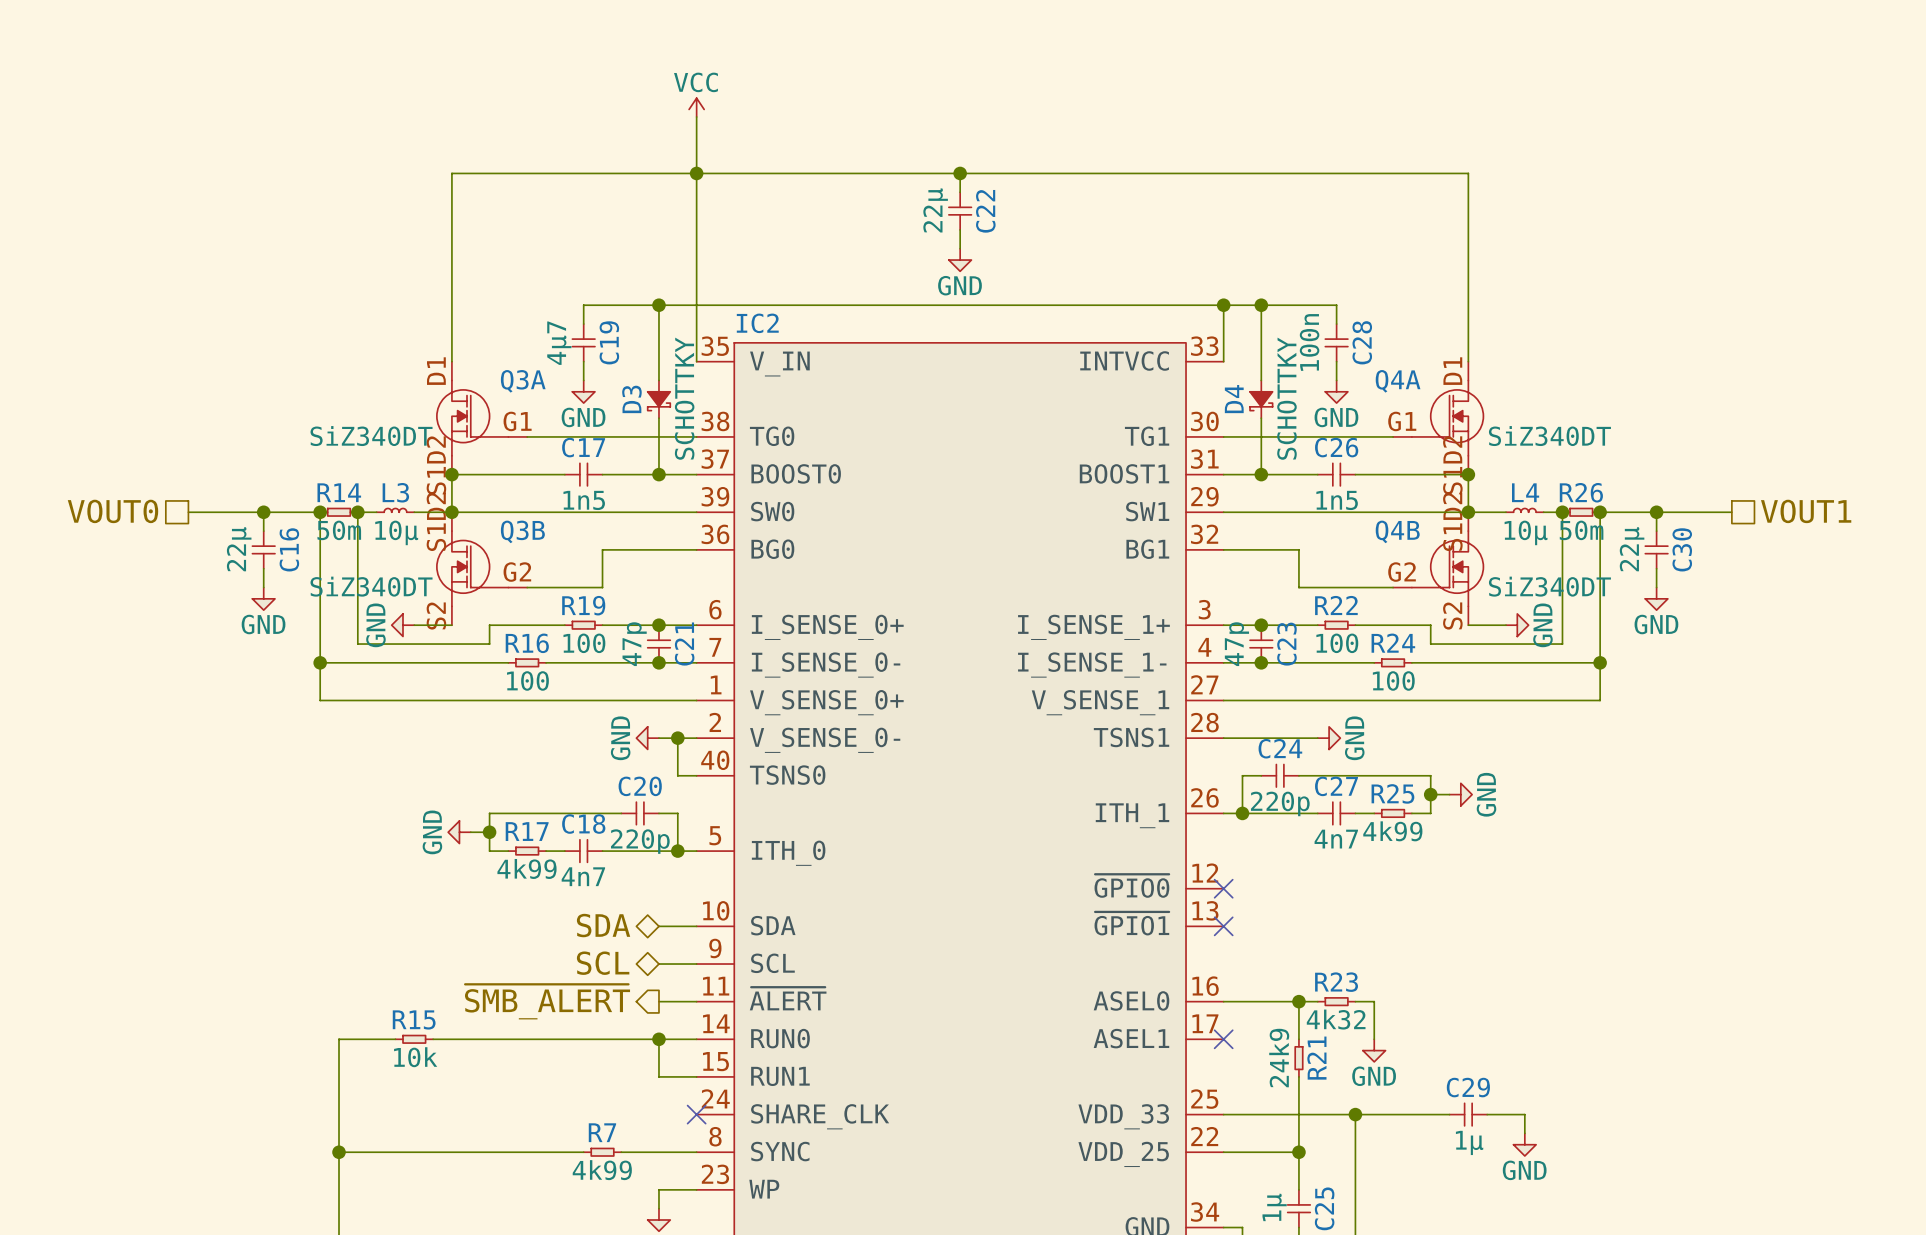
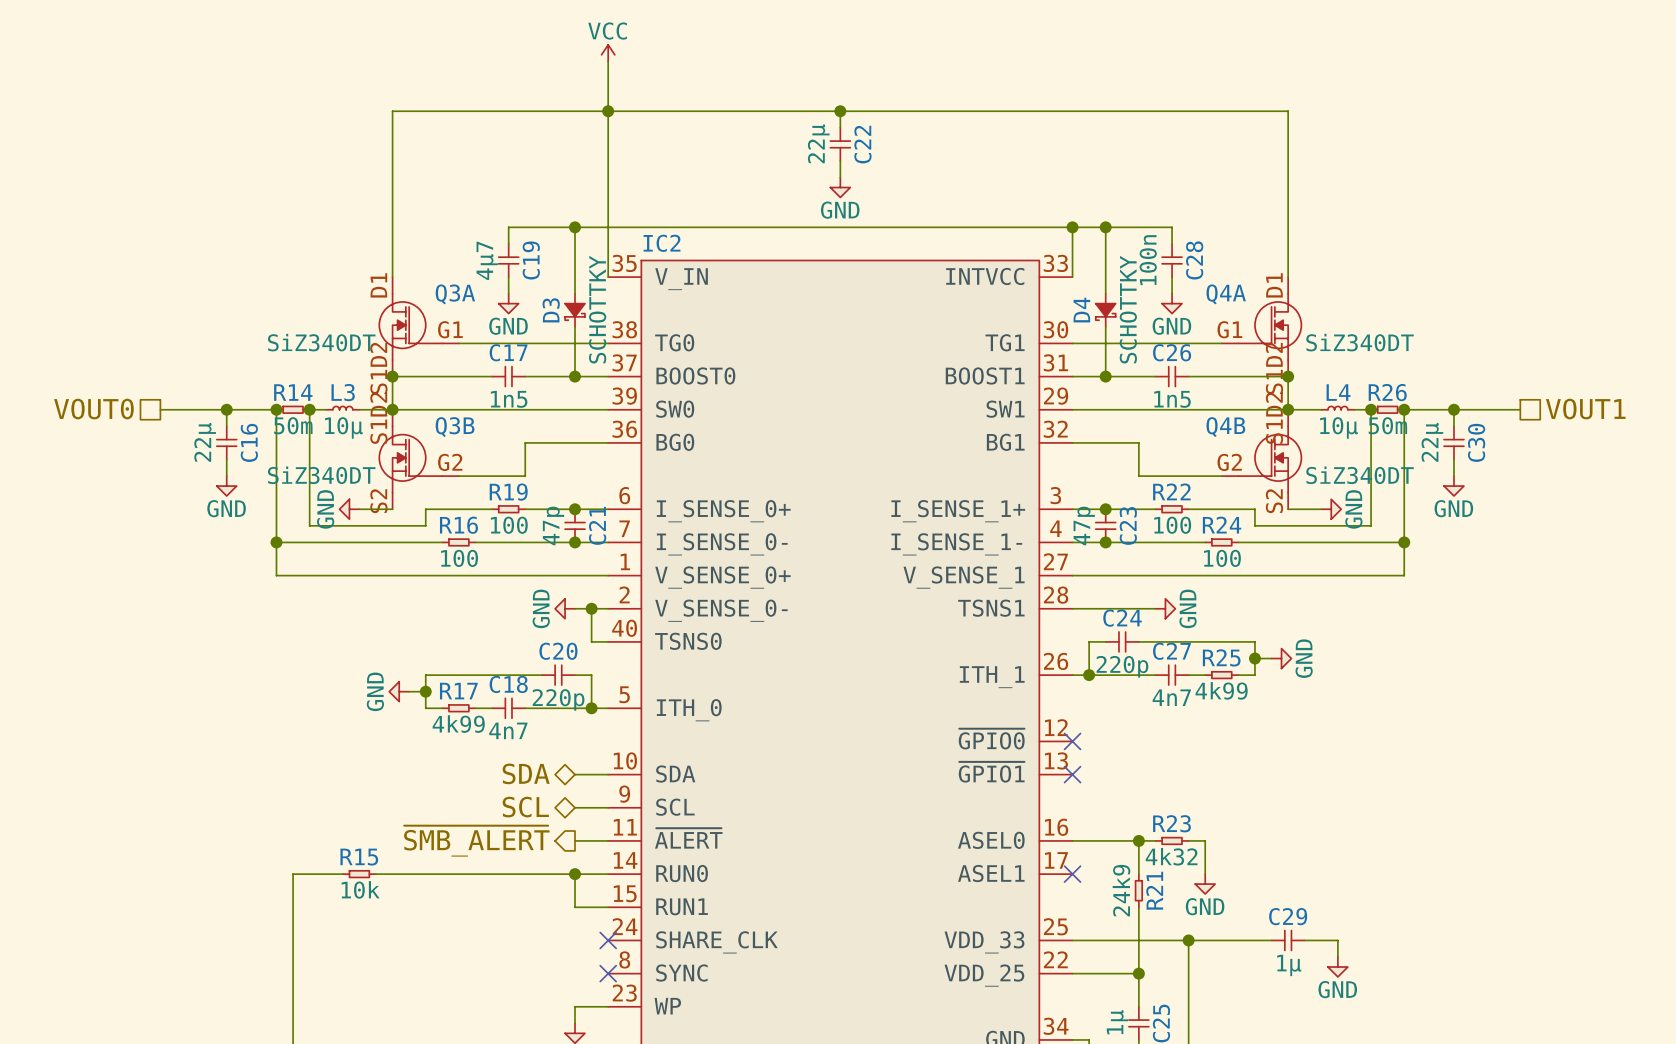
wire: (339, 1152) (583, 1152) -> none
junction: (339, 1152) -> none
R7: 4k99 (602, 1152) -> none
wire: (621, 1152) (696, 1152) -> none
no-connect mark: none -> (608, 973)

